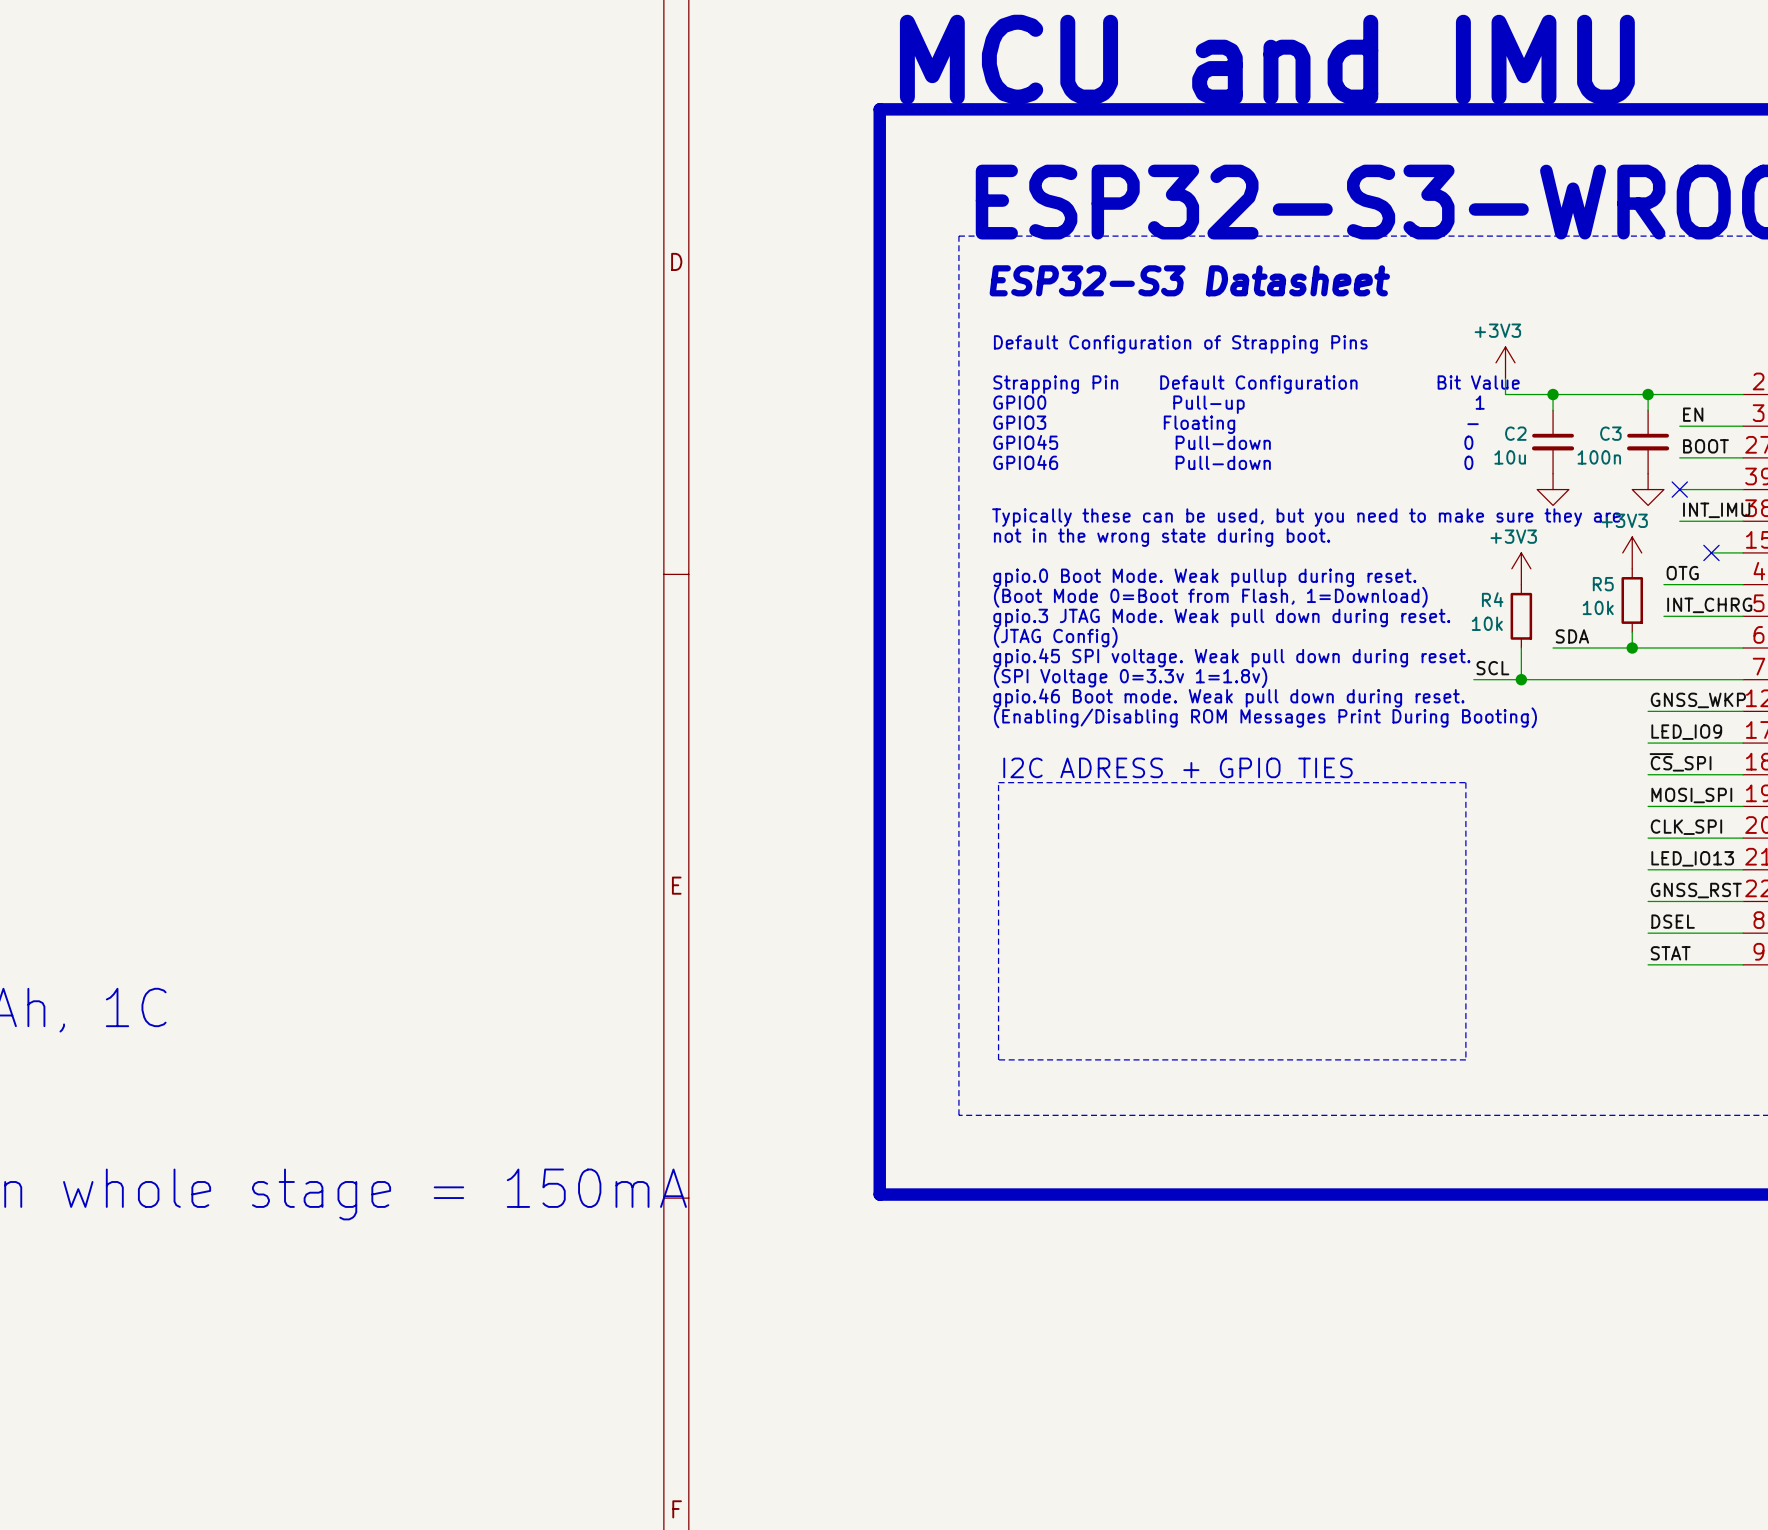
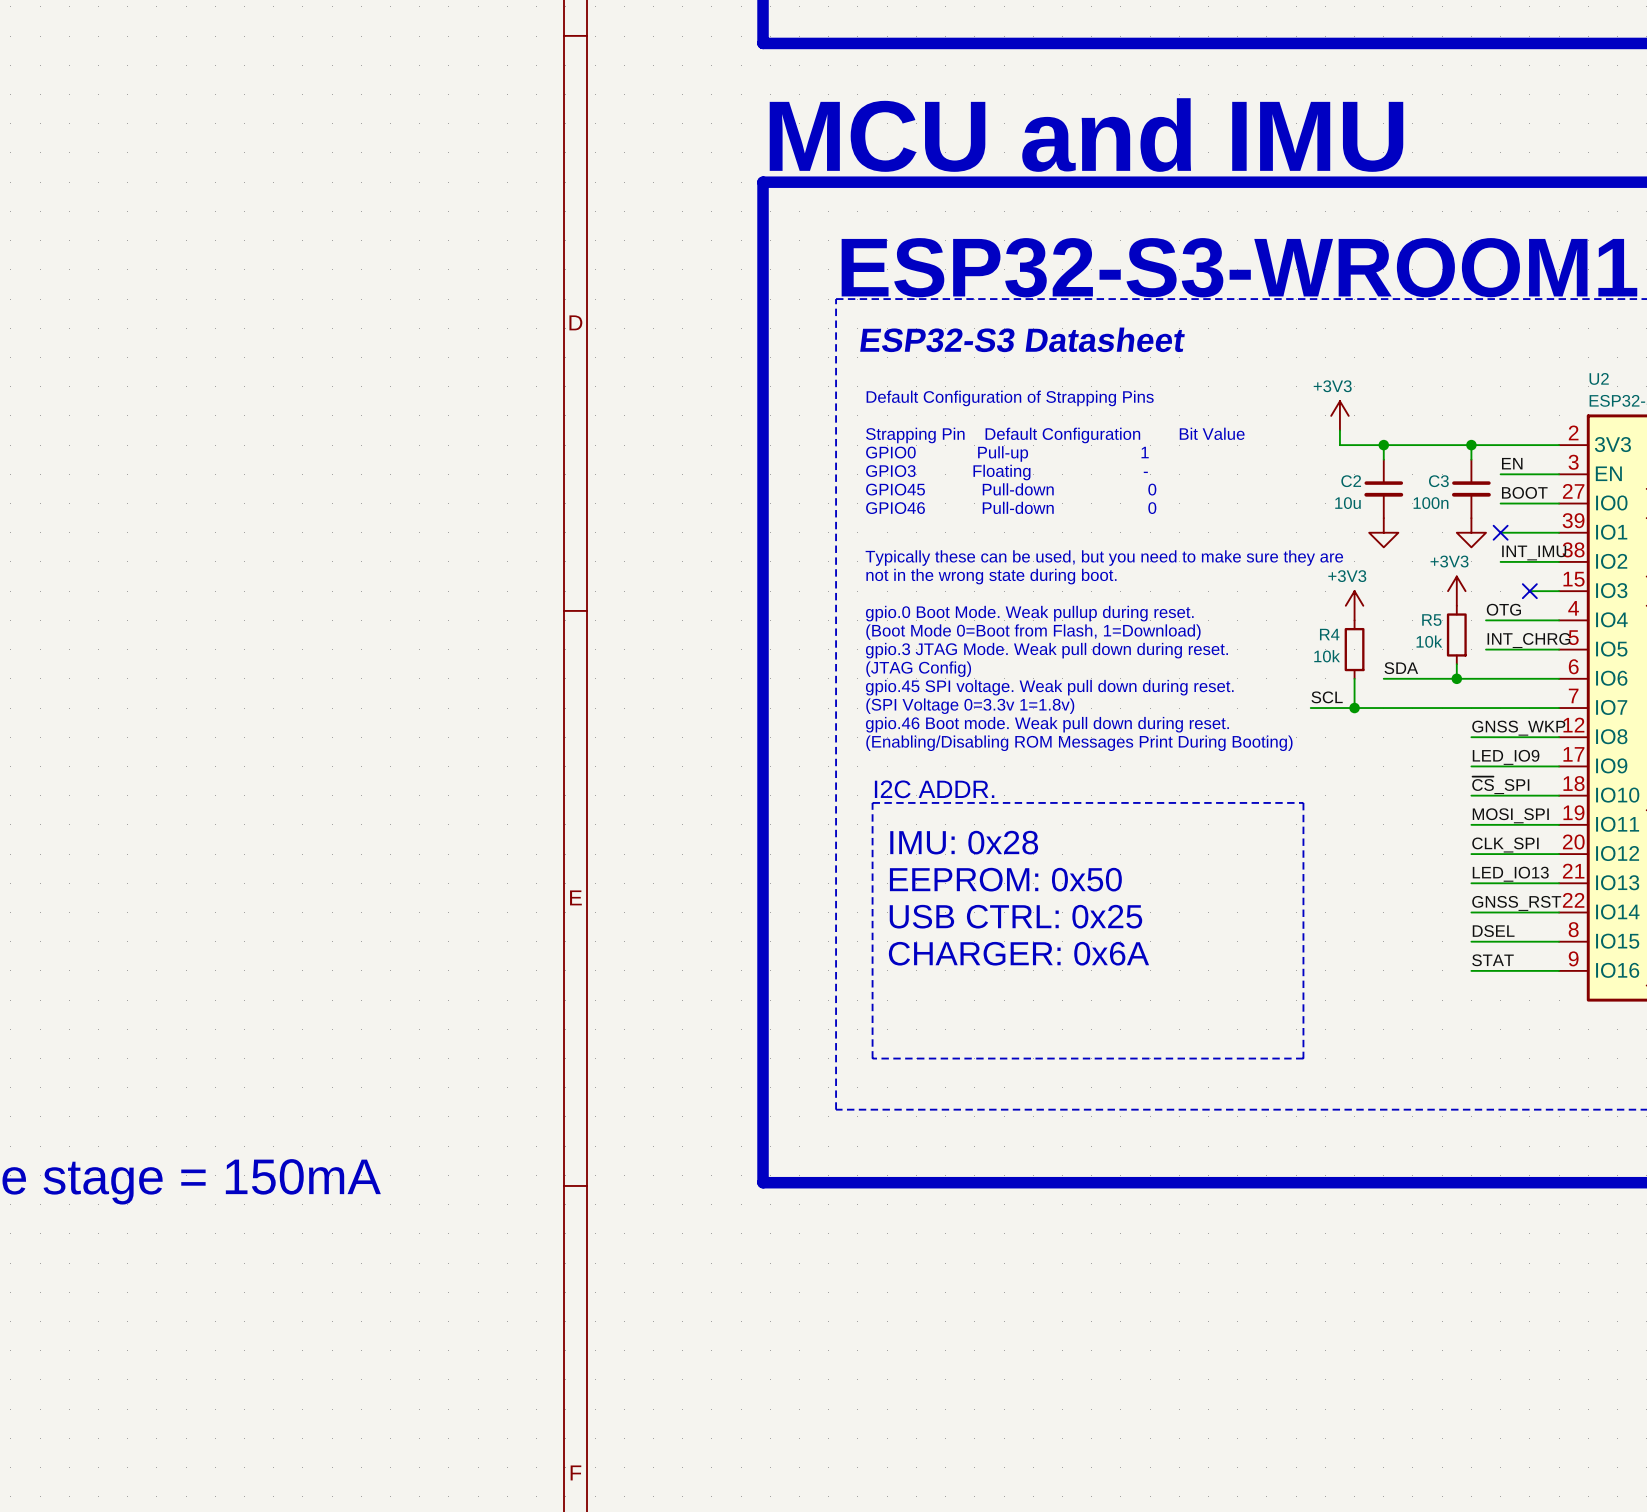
text: I2C ADRESS + GPIO TIES (1178, 767) -> I2C ADDR. (934, 789)
text: none -> IMU: 0x28 (964, 842)
text: none -> EEPROM: 0x50 (1005, 879)
text: none -> USB CTRL: 0x25 (1015, 916)
text: none -> CHARGER: 0x6A (1018, 953)

